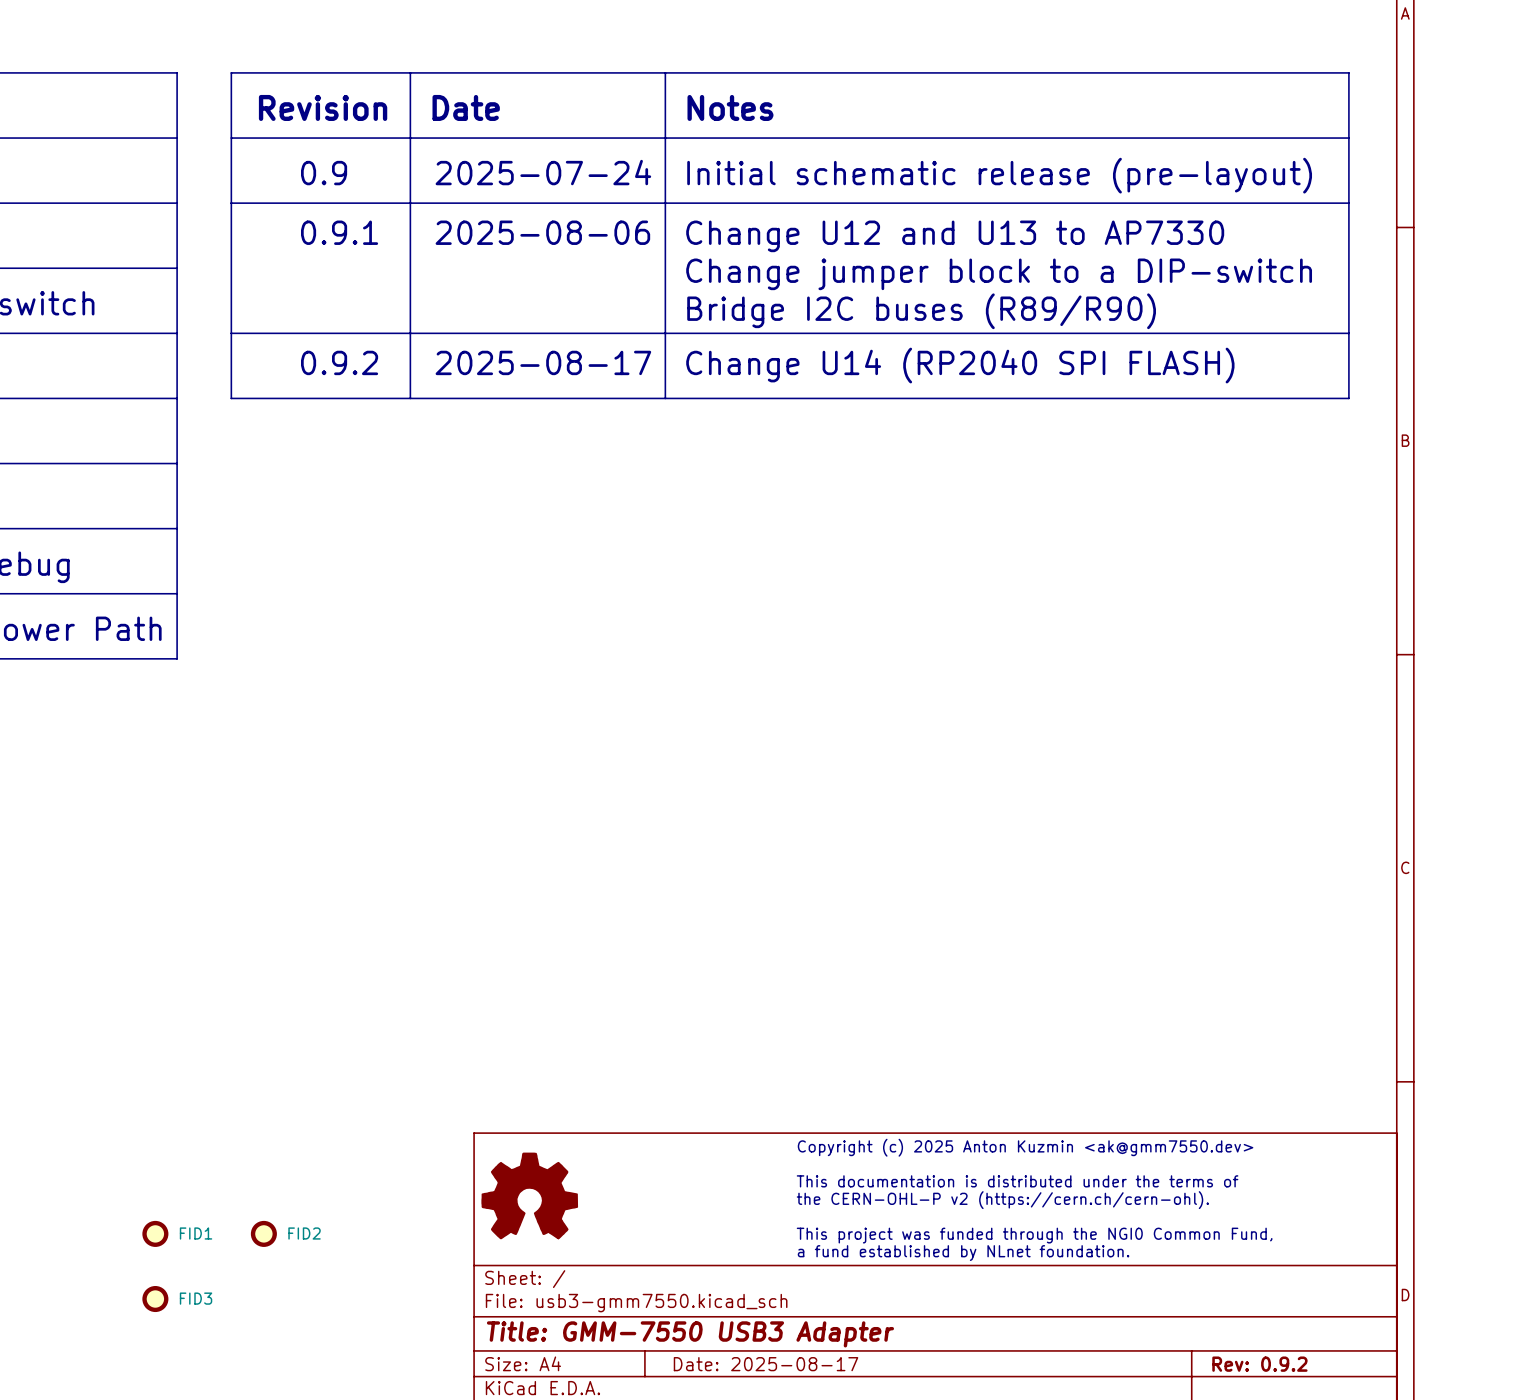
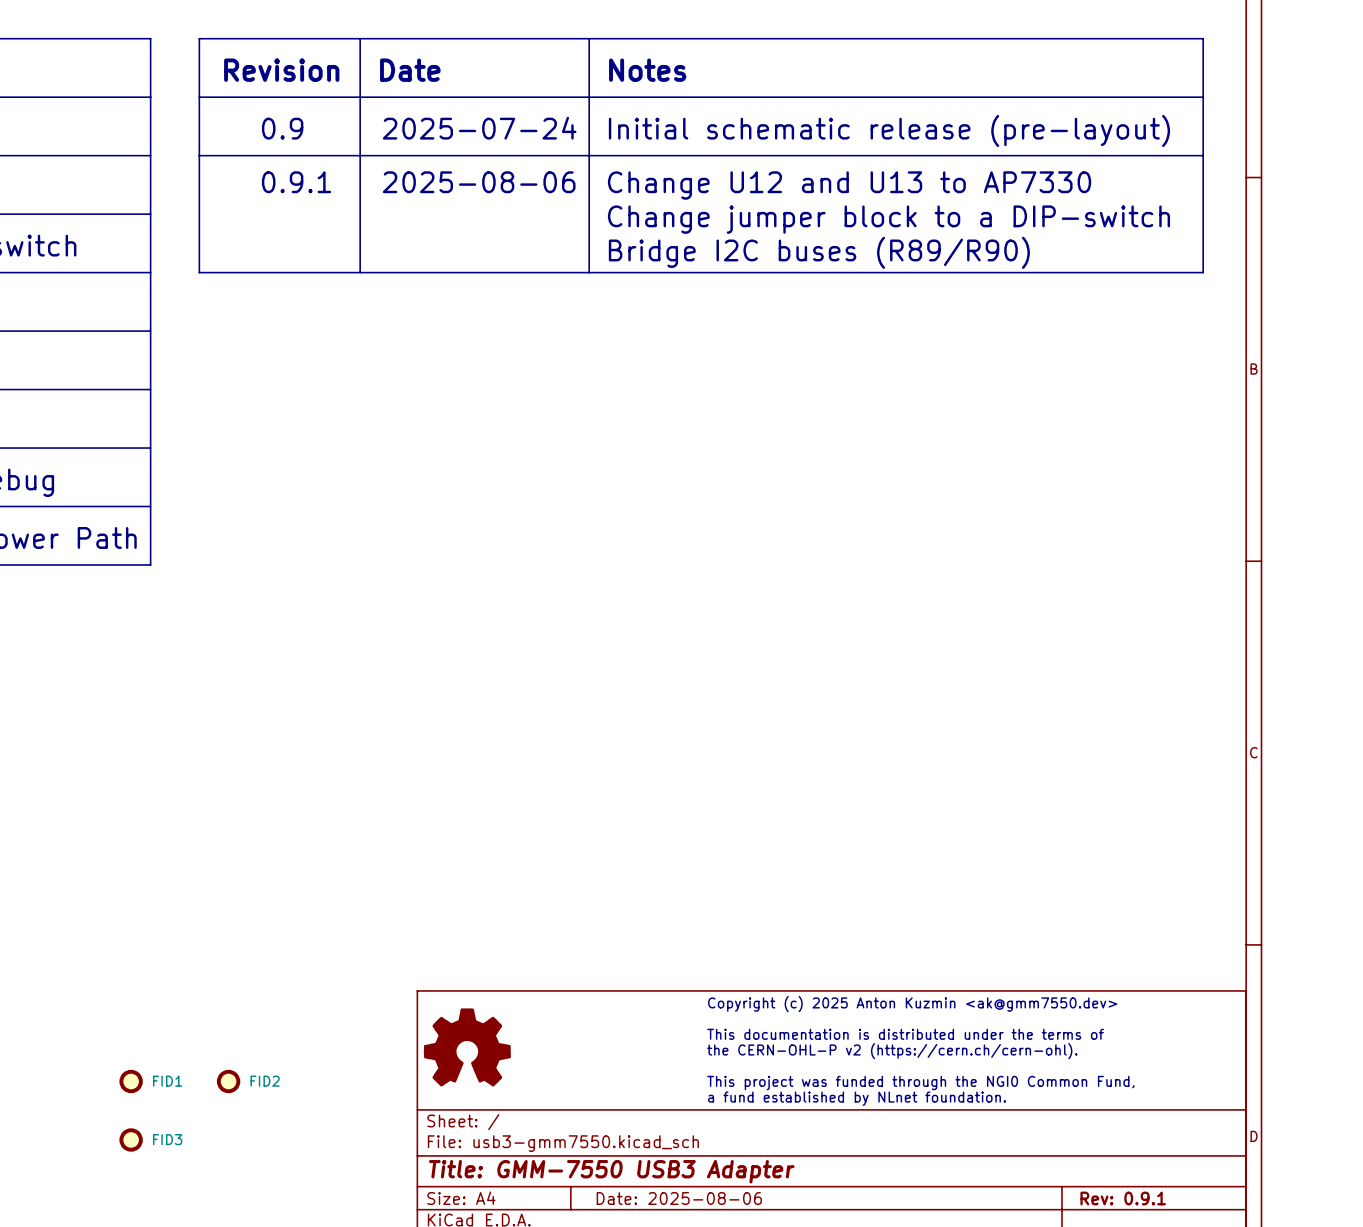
line: (231, 333) (231, 398) (1348, 398) (1348, 333) -> none
line: (410, 333) (410, 398) -> none
line: (665, 333) (665, 398) -> none
text: 0.9.2 (339, 362) -> none
text: 2025-08-17 (543, 362) -> none
text: Change U14 (RP2040 SPI FLASH) (960, 365) -> none
title block: Date: 2025-08-17 (766, 1364) -> Date: 2025-08-06 (679, 1198)
title block: Rev: 0.9.2 (1259, 1364) -> Rev: 0.9.1 (1123, 1198)

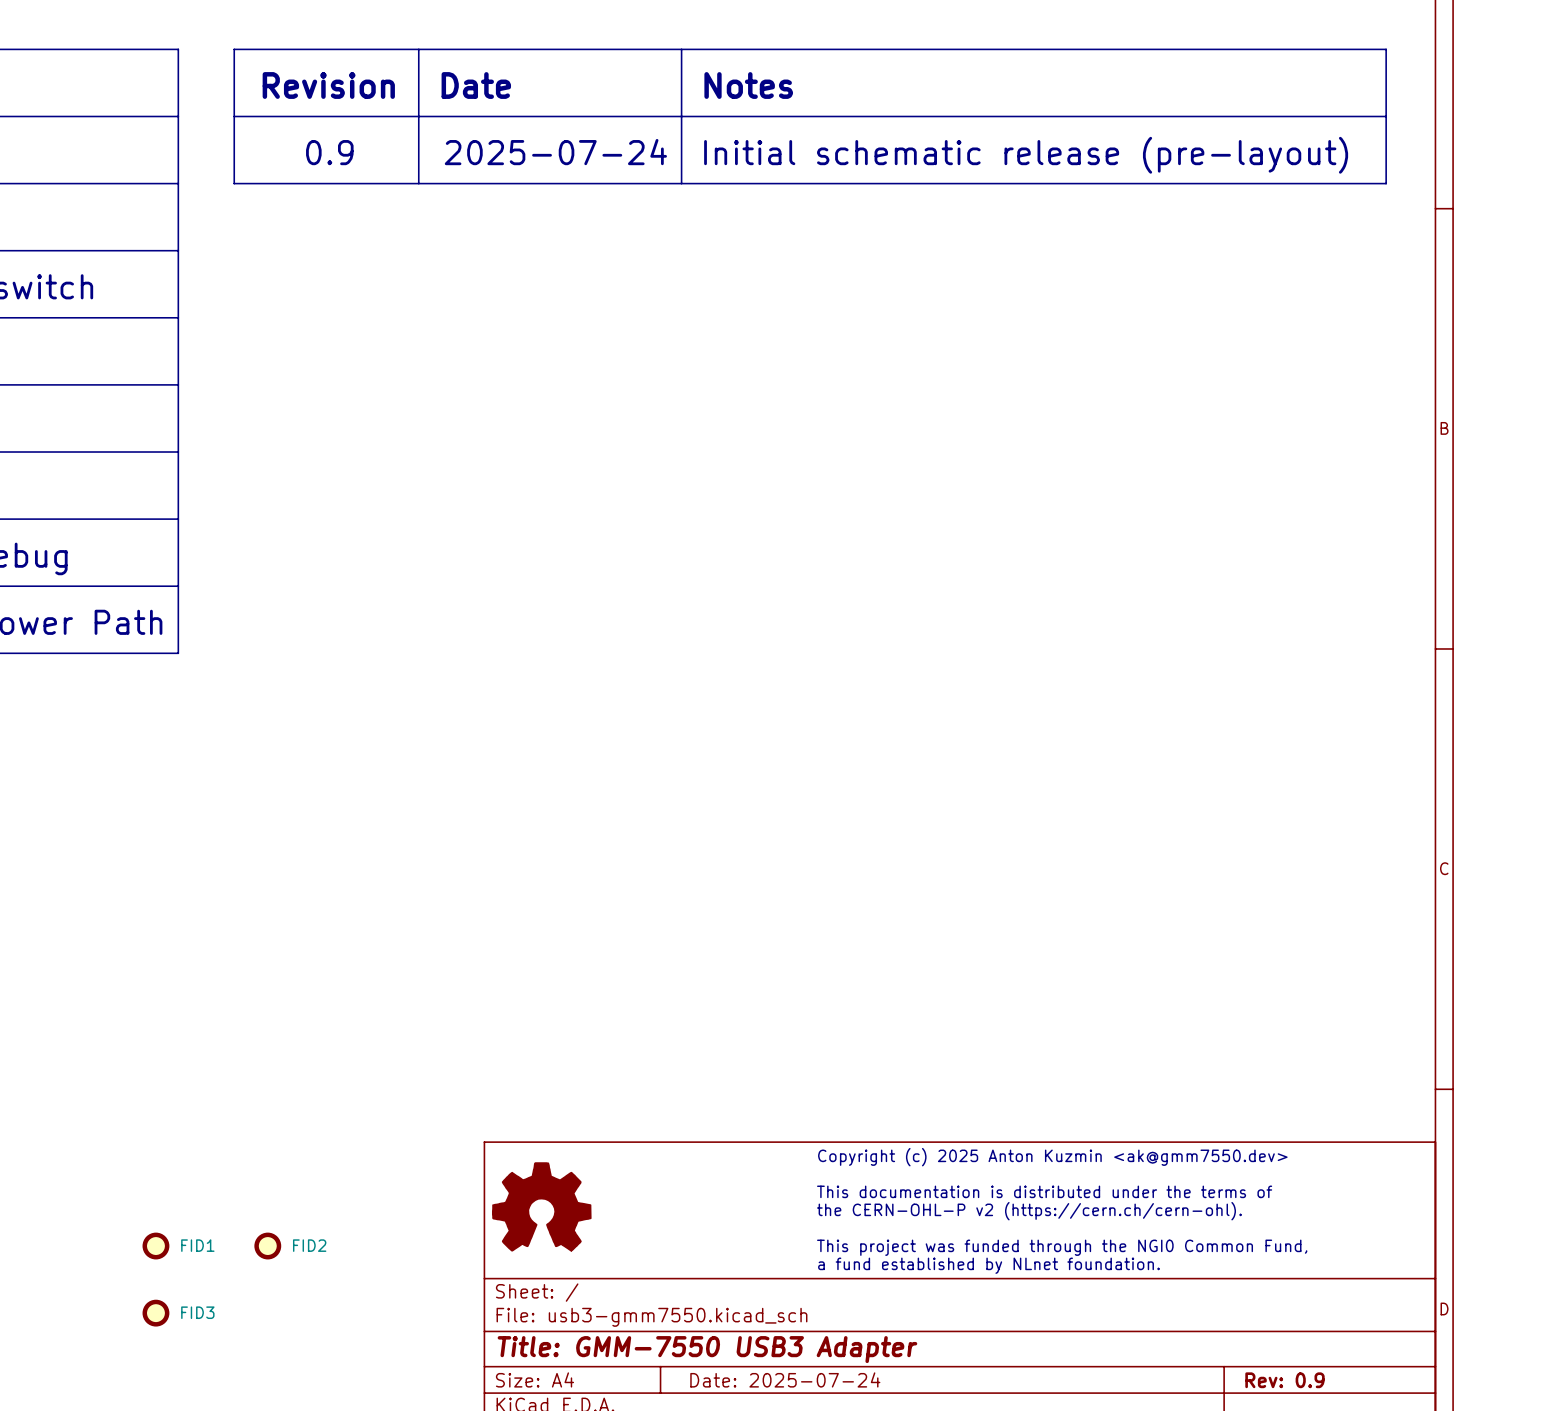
line: (199, 155) (199, 272) (1203, 272) (1203, 155) -> none
line: (360, 155) (360, 272) -> none
line: (589, 155) (589, 272) -> none
text: 0.9.1 (296, 182) -> none
text: 2025-08-06 (479, 182) -> none
text: Change U12 and U13 to AP7330 (849, 185) -> none
text: Change jumper block to a DIP-switch (888, 219) -> none
text: Bridge I2C buses (R89/R90) (819, 252) -> none
title block: Date: 2025-08-06 (679, 1198) -> Date: 2025-07-24 (785, 1379)
title block: Rev: 0.9.1 (1123, 1198) -> Rev: 0.9 (1284, 1380)

